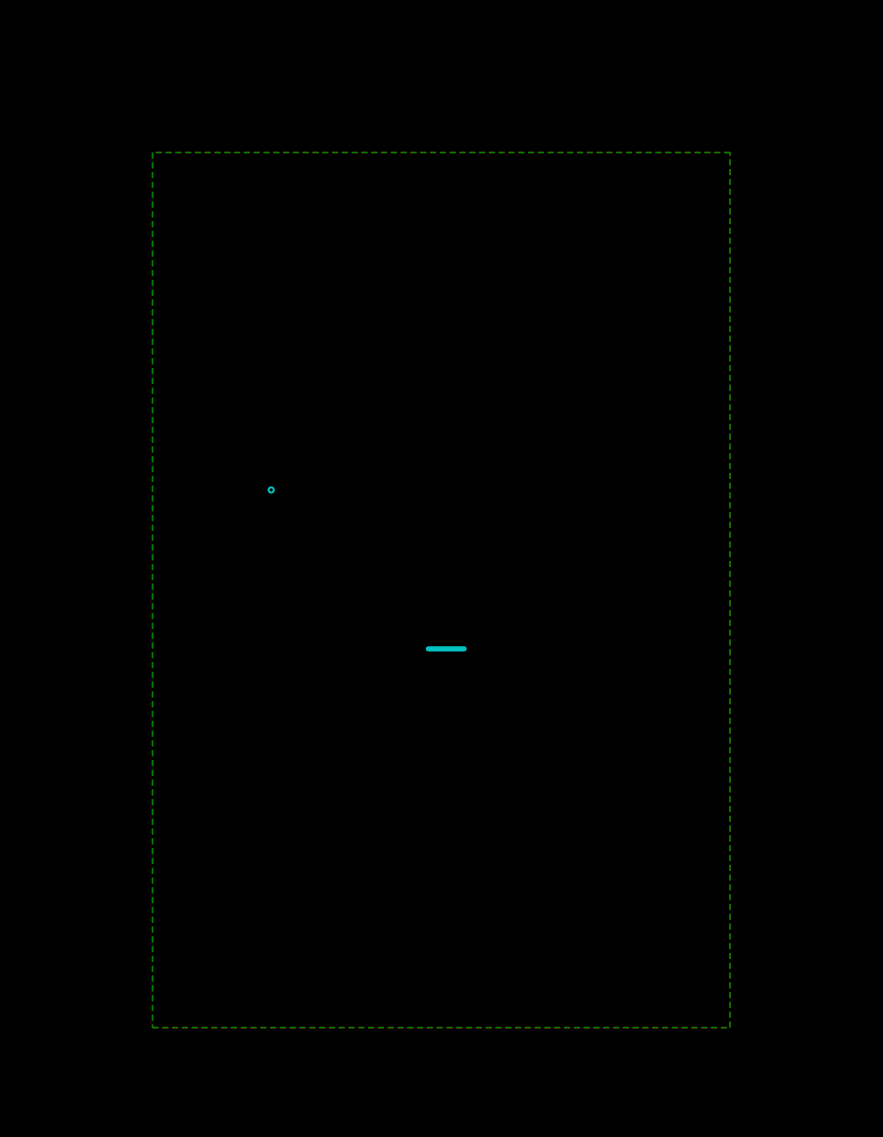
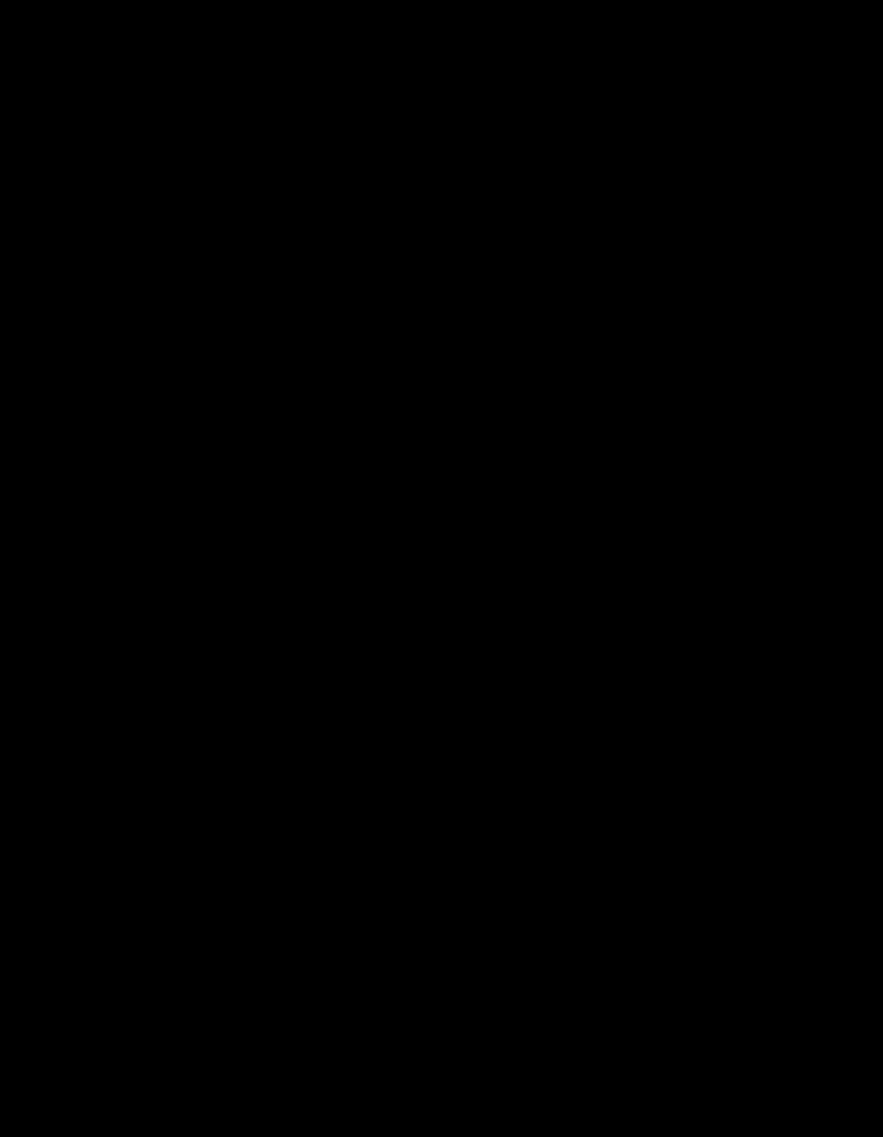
bottom zone outline: (730, 152) (730, 1027) (152, 1027) (152, 152) (730, 152) -> none
drawing: [267, 486, 275, 494] -> none
line: (464, 648) (428, 648) -> none

